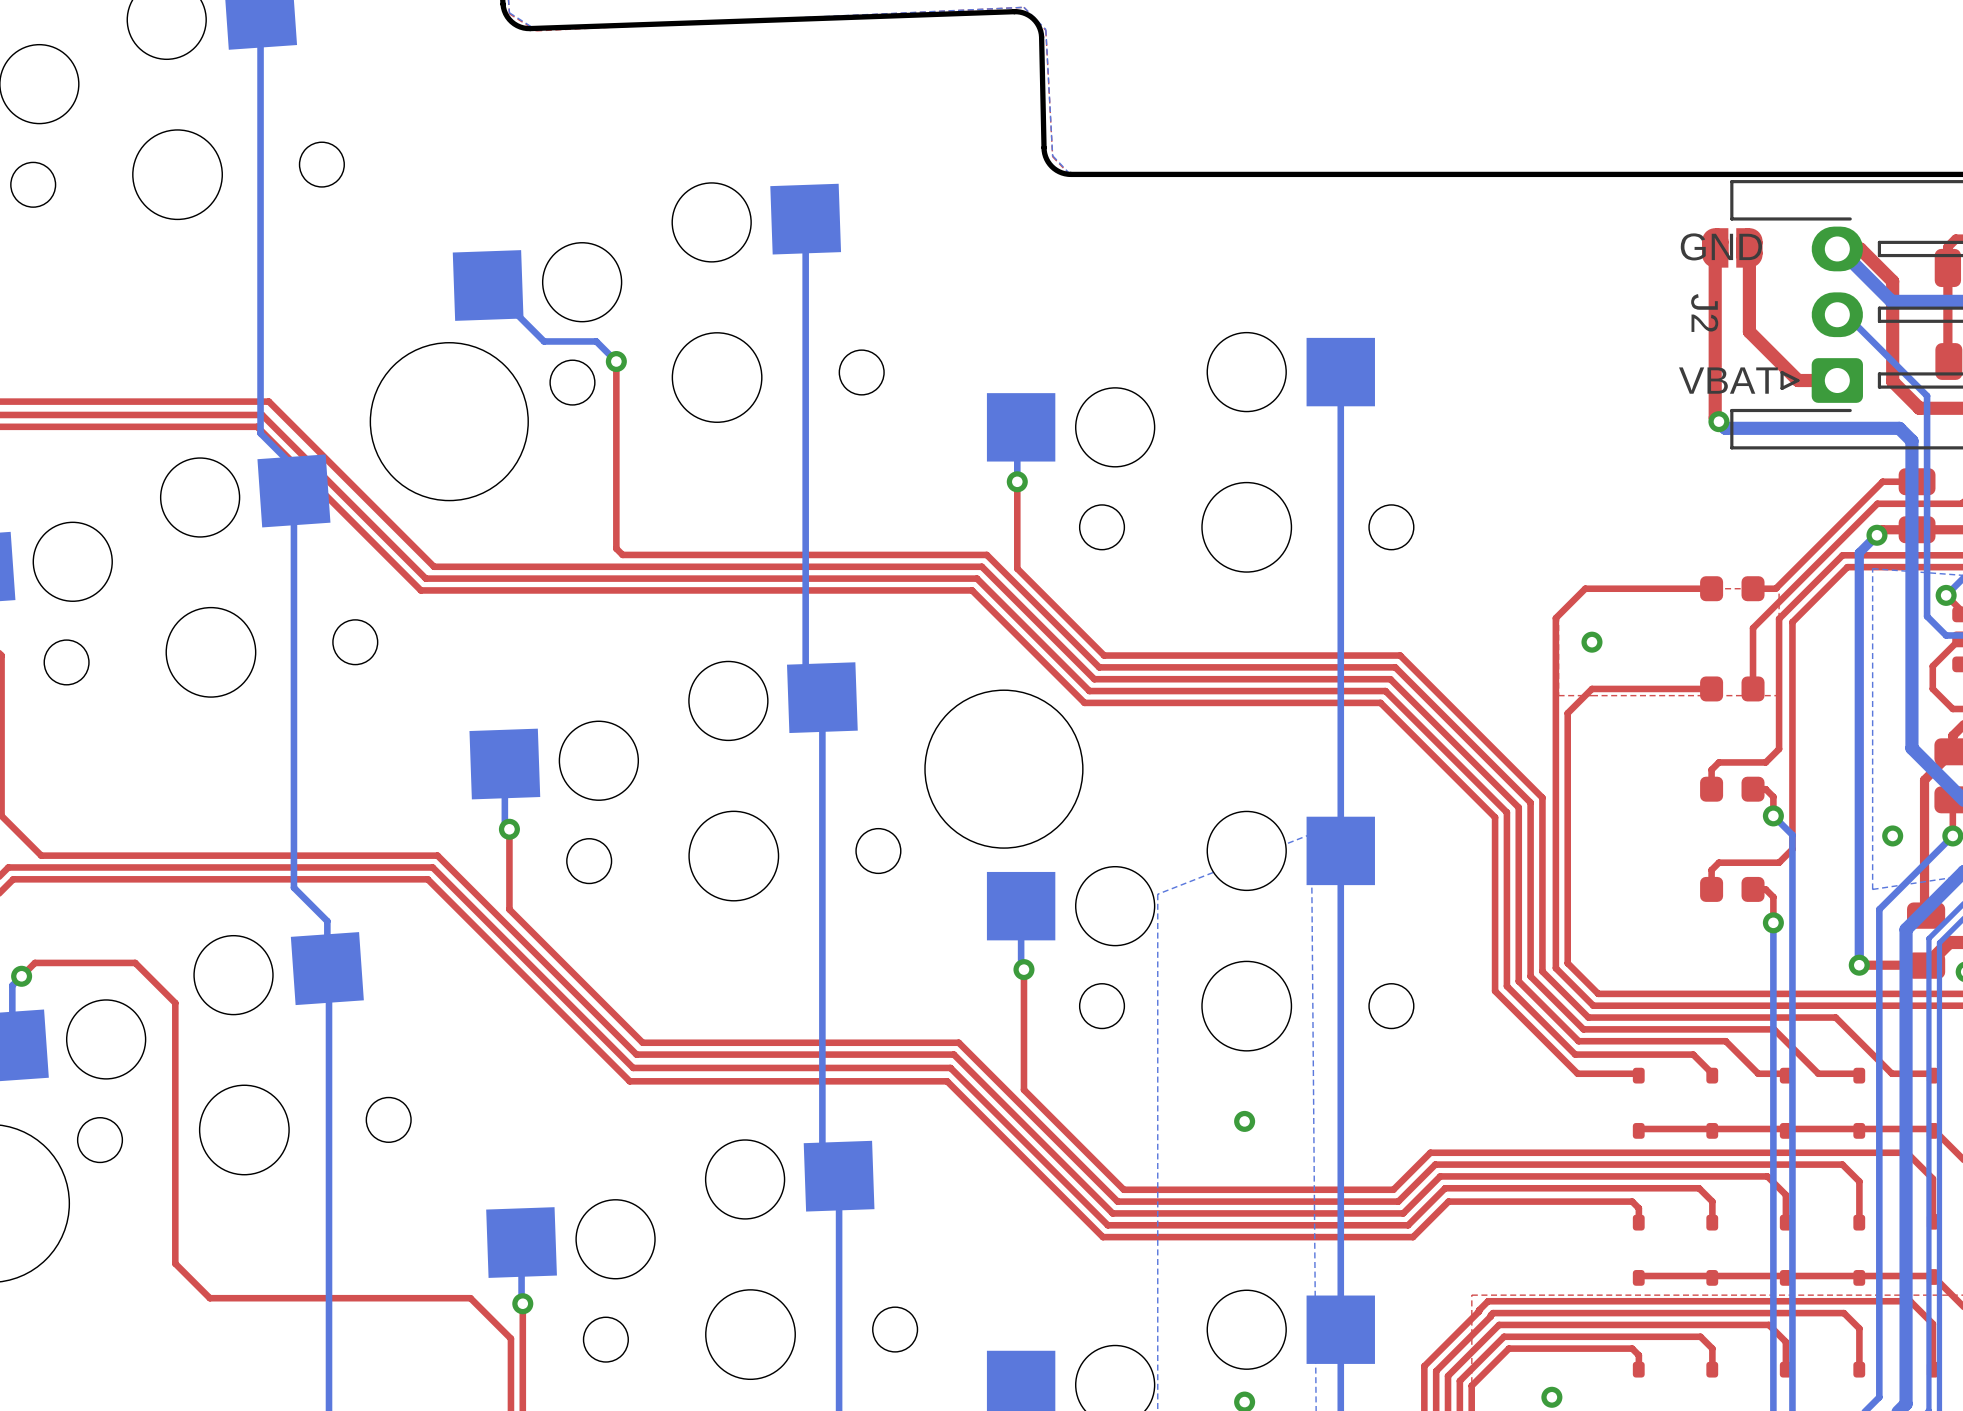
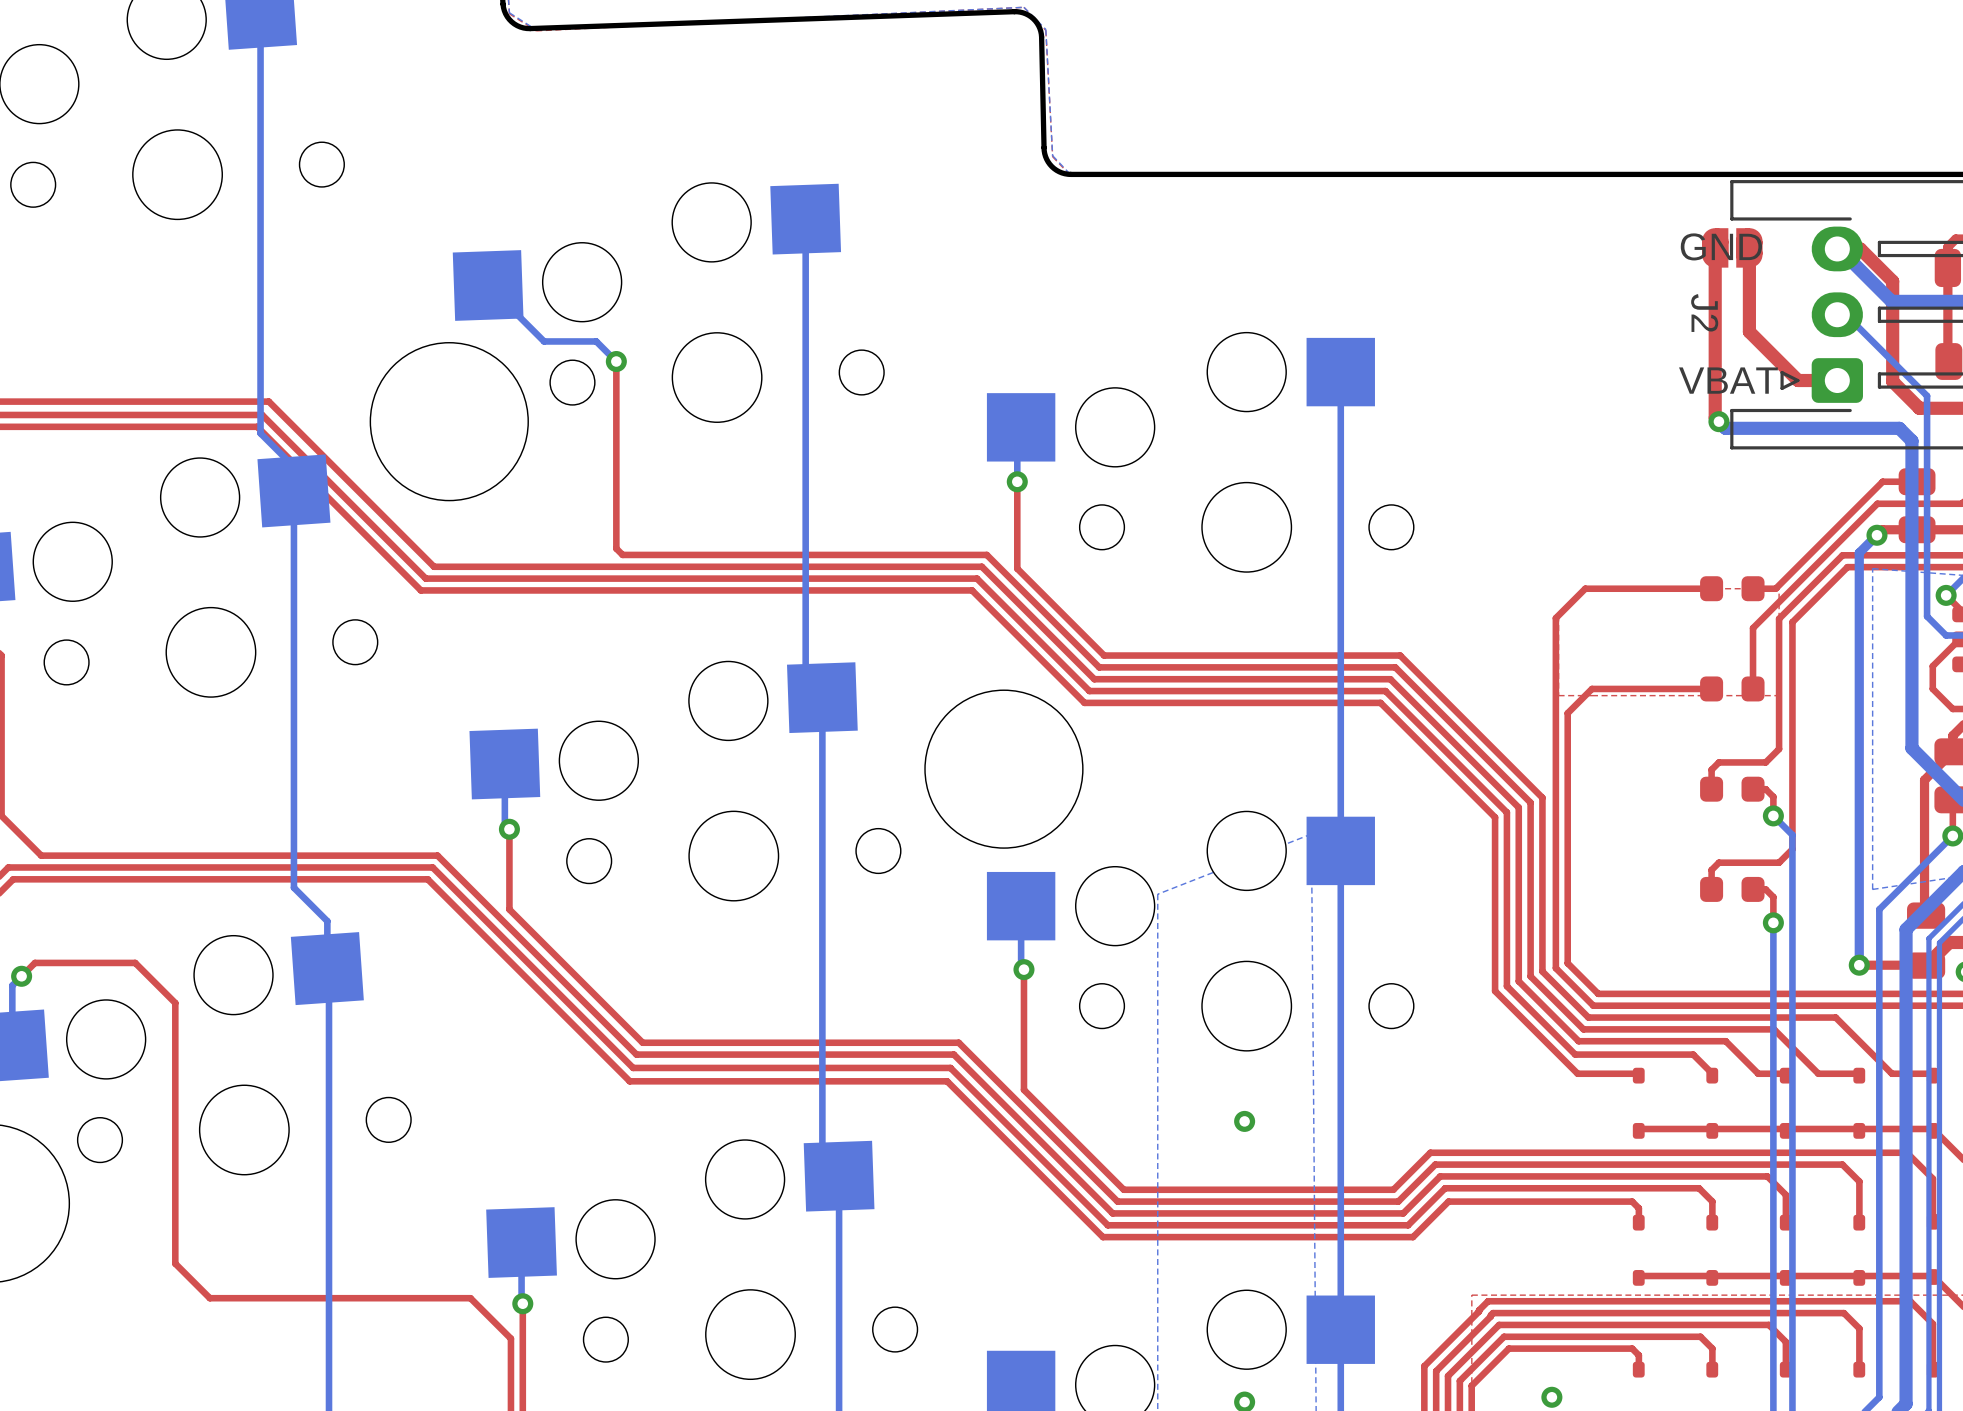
via: (1591, 642) -> none
via: (1892, 835) -> none

